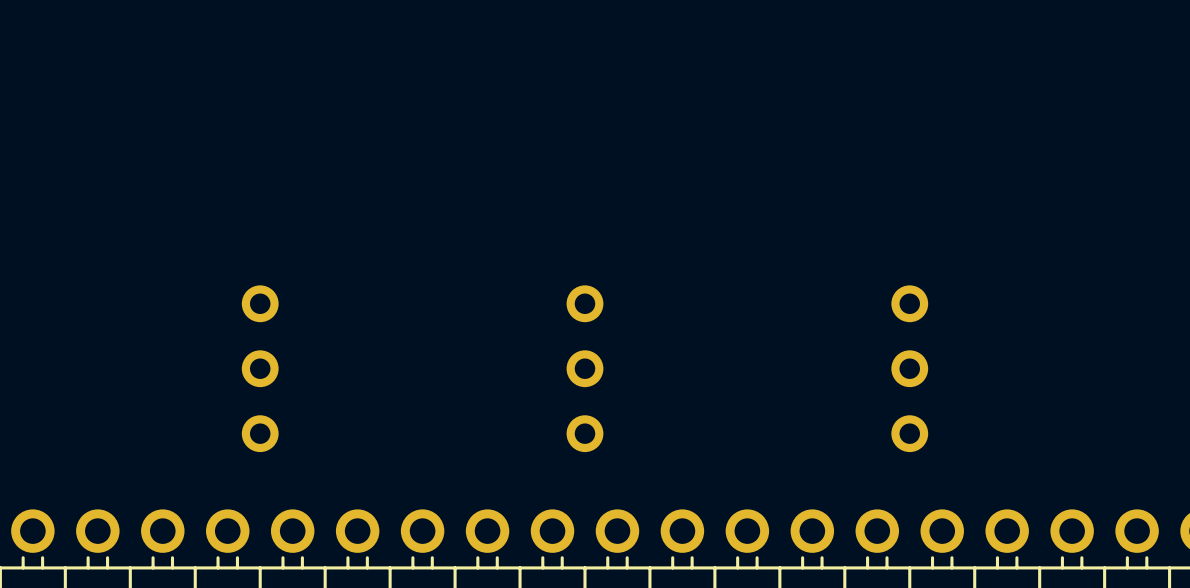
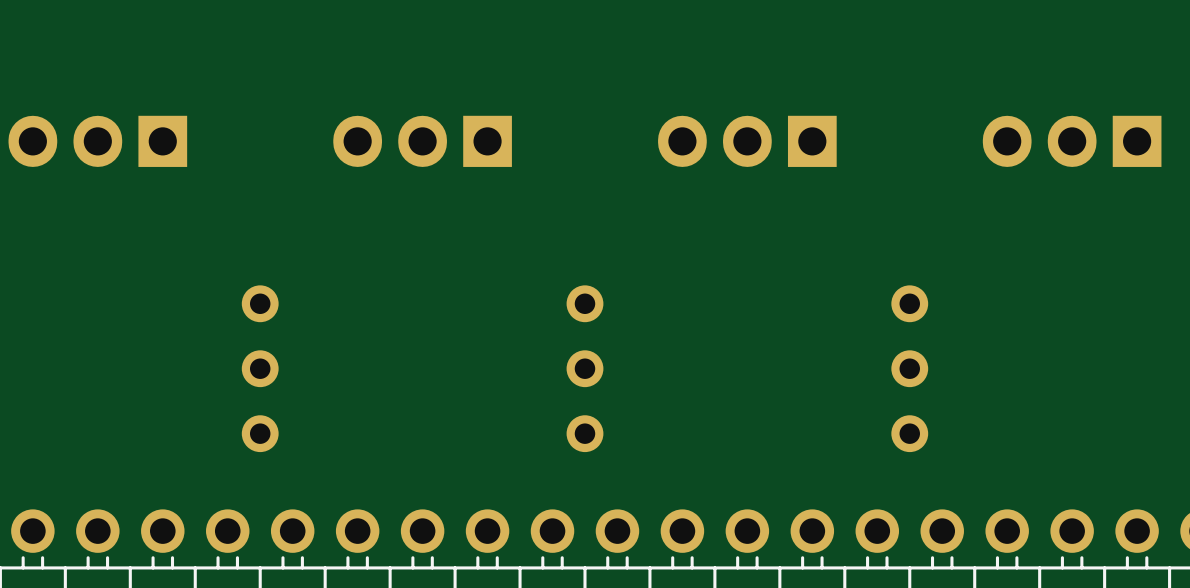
part: none -> (97, 141)
part: none -> (422, 141)
part: none -> (747, 141)
part: none -> (1072, 141)

